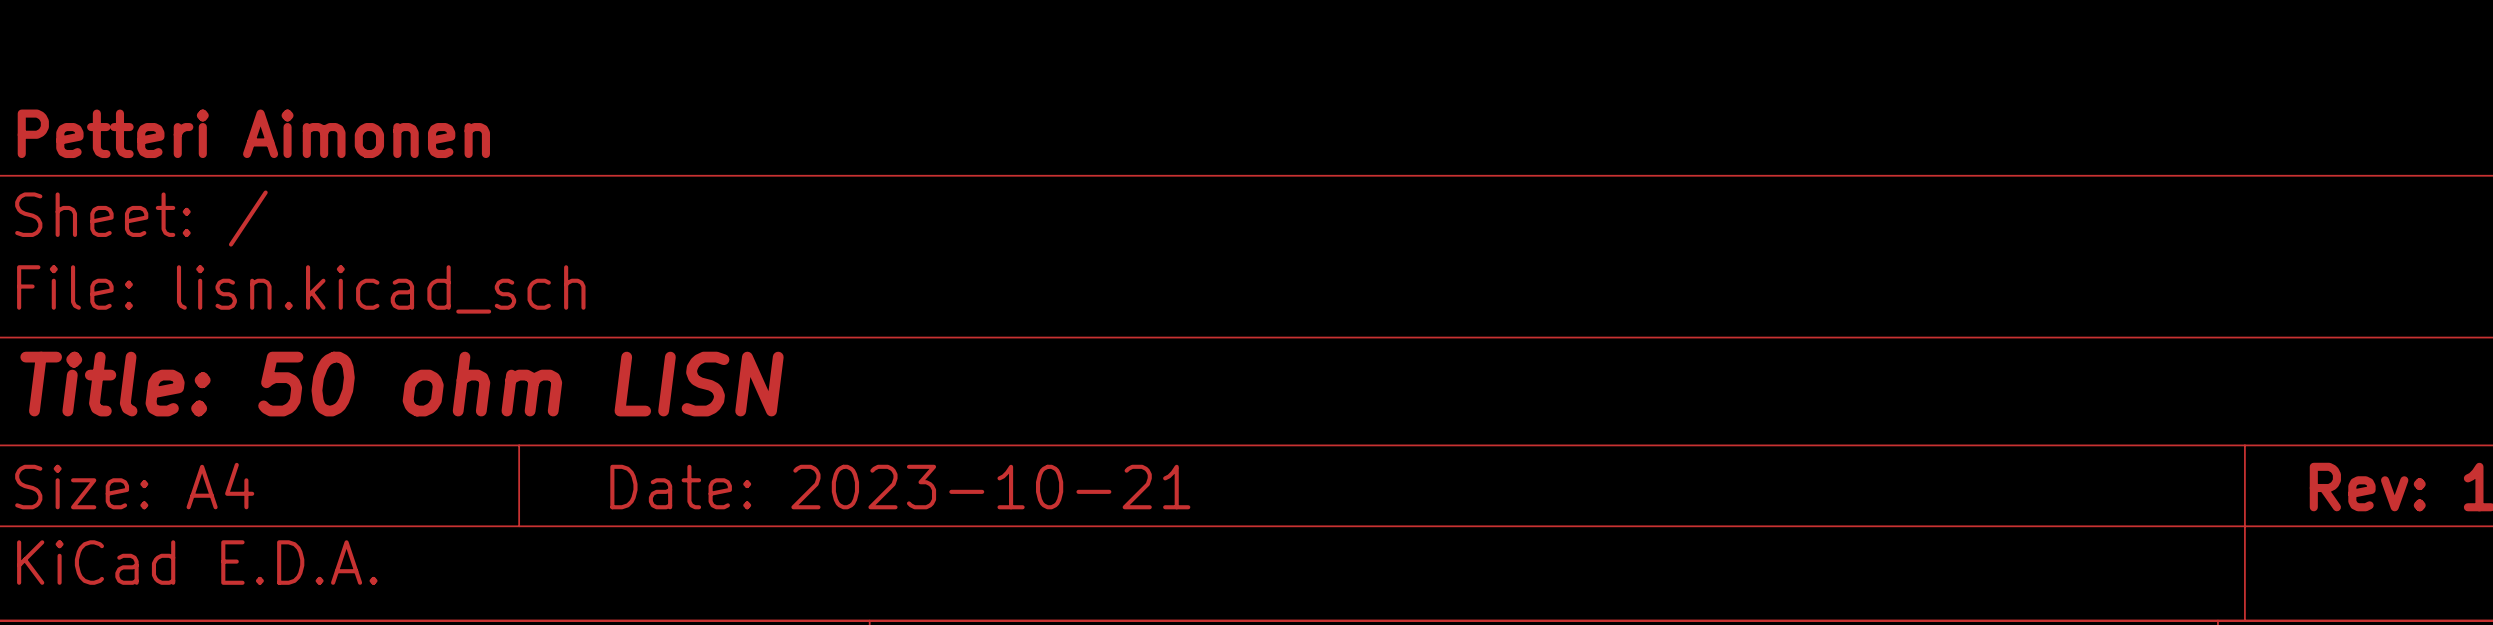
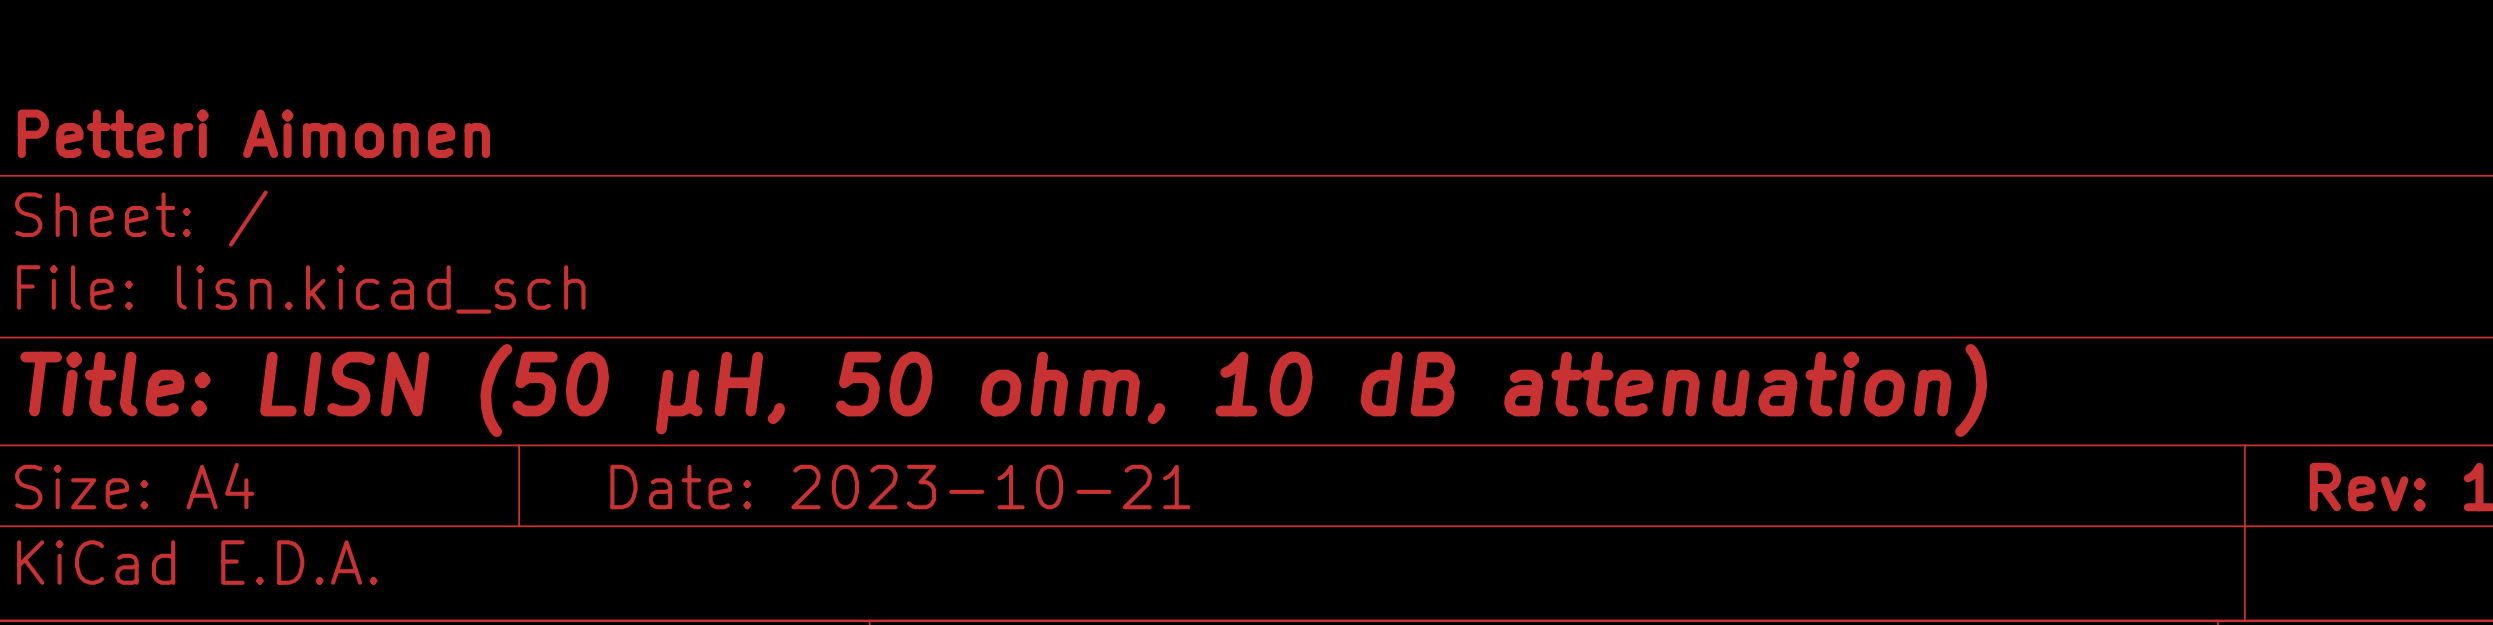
title block: Title: 50 ohm LISN (402, 384) -> Title: LISN (50 µH, 50 ohm, 10 dB attenuation) (1003, 390)

